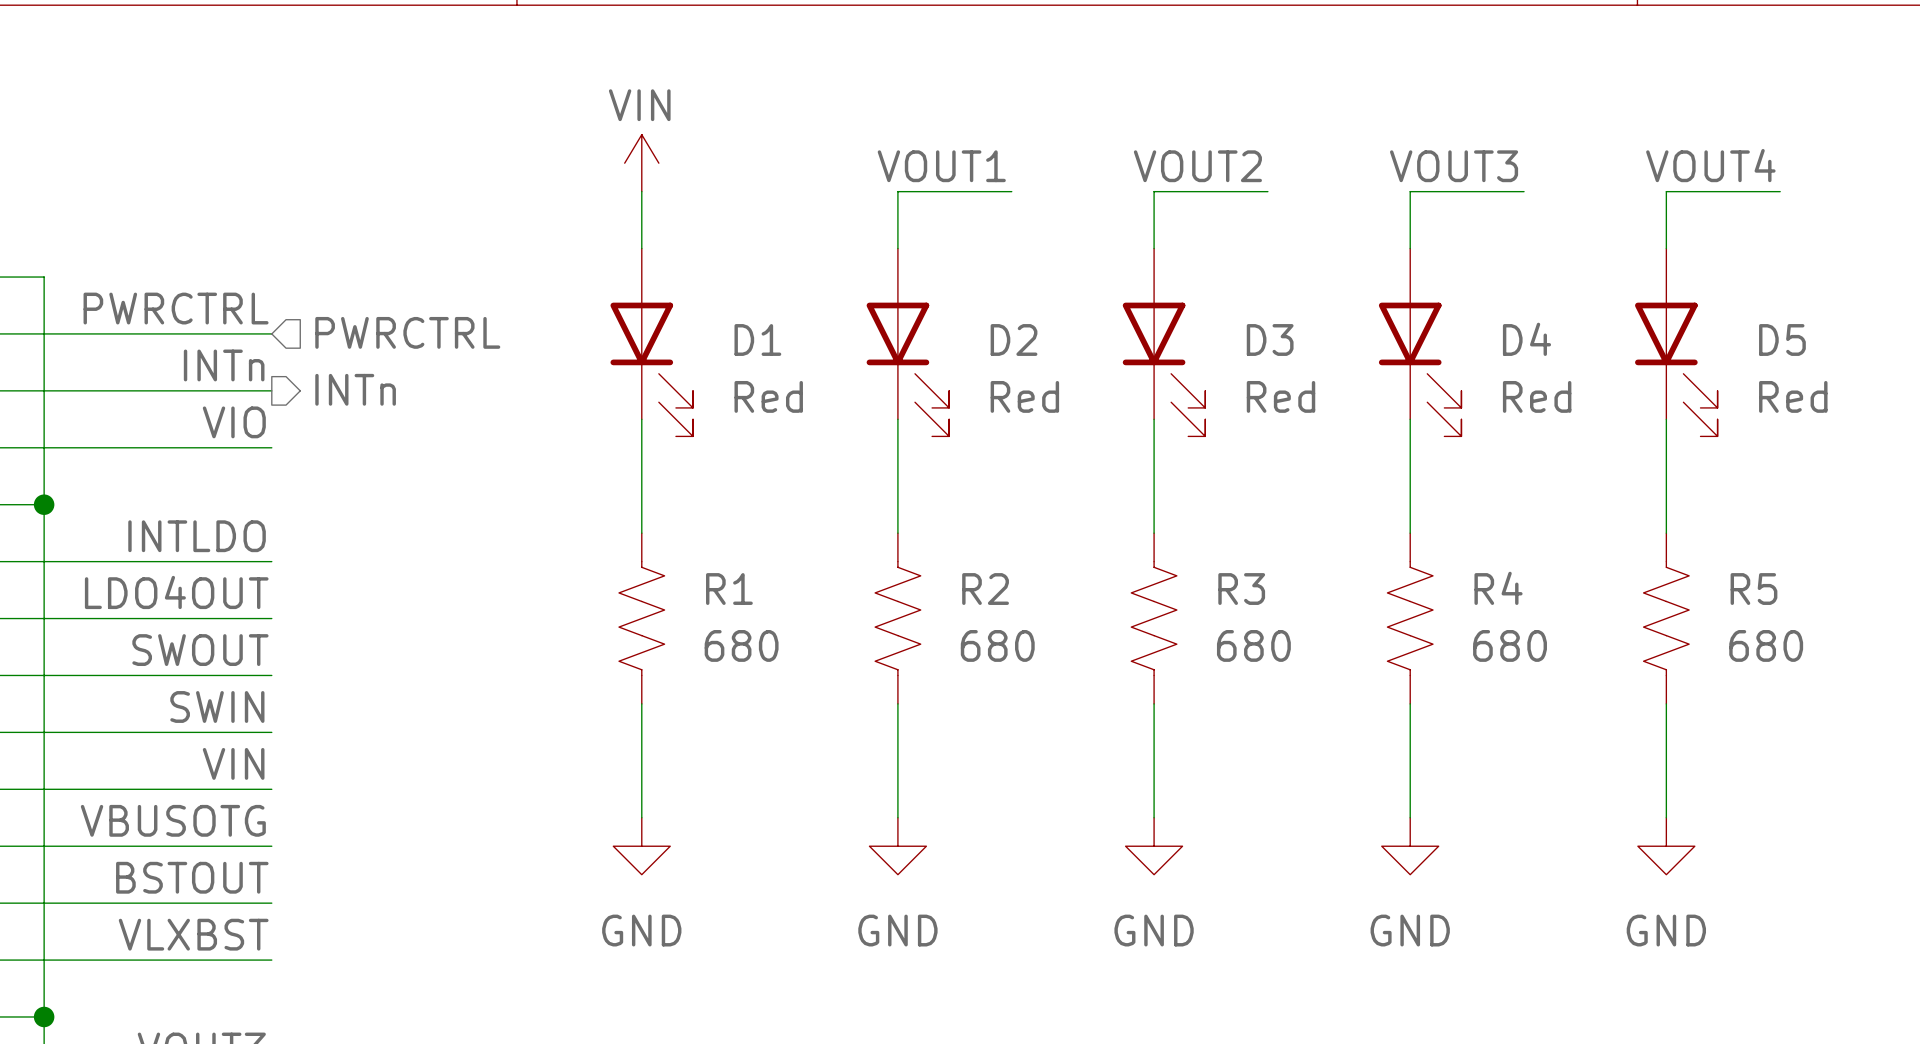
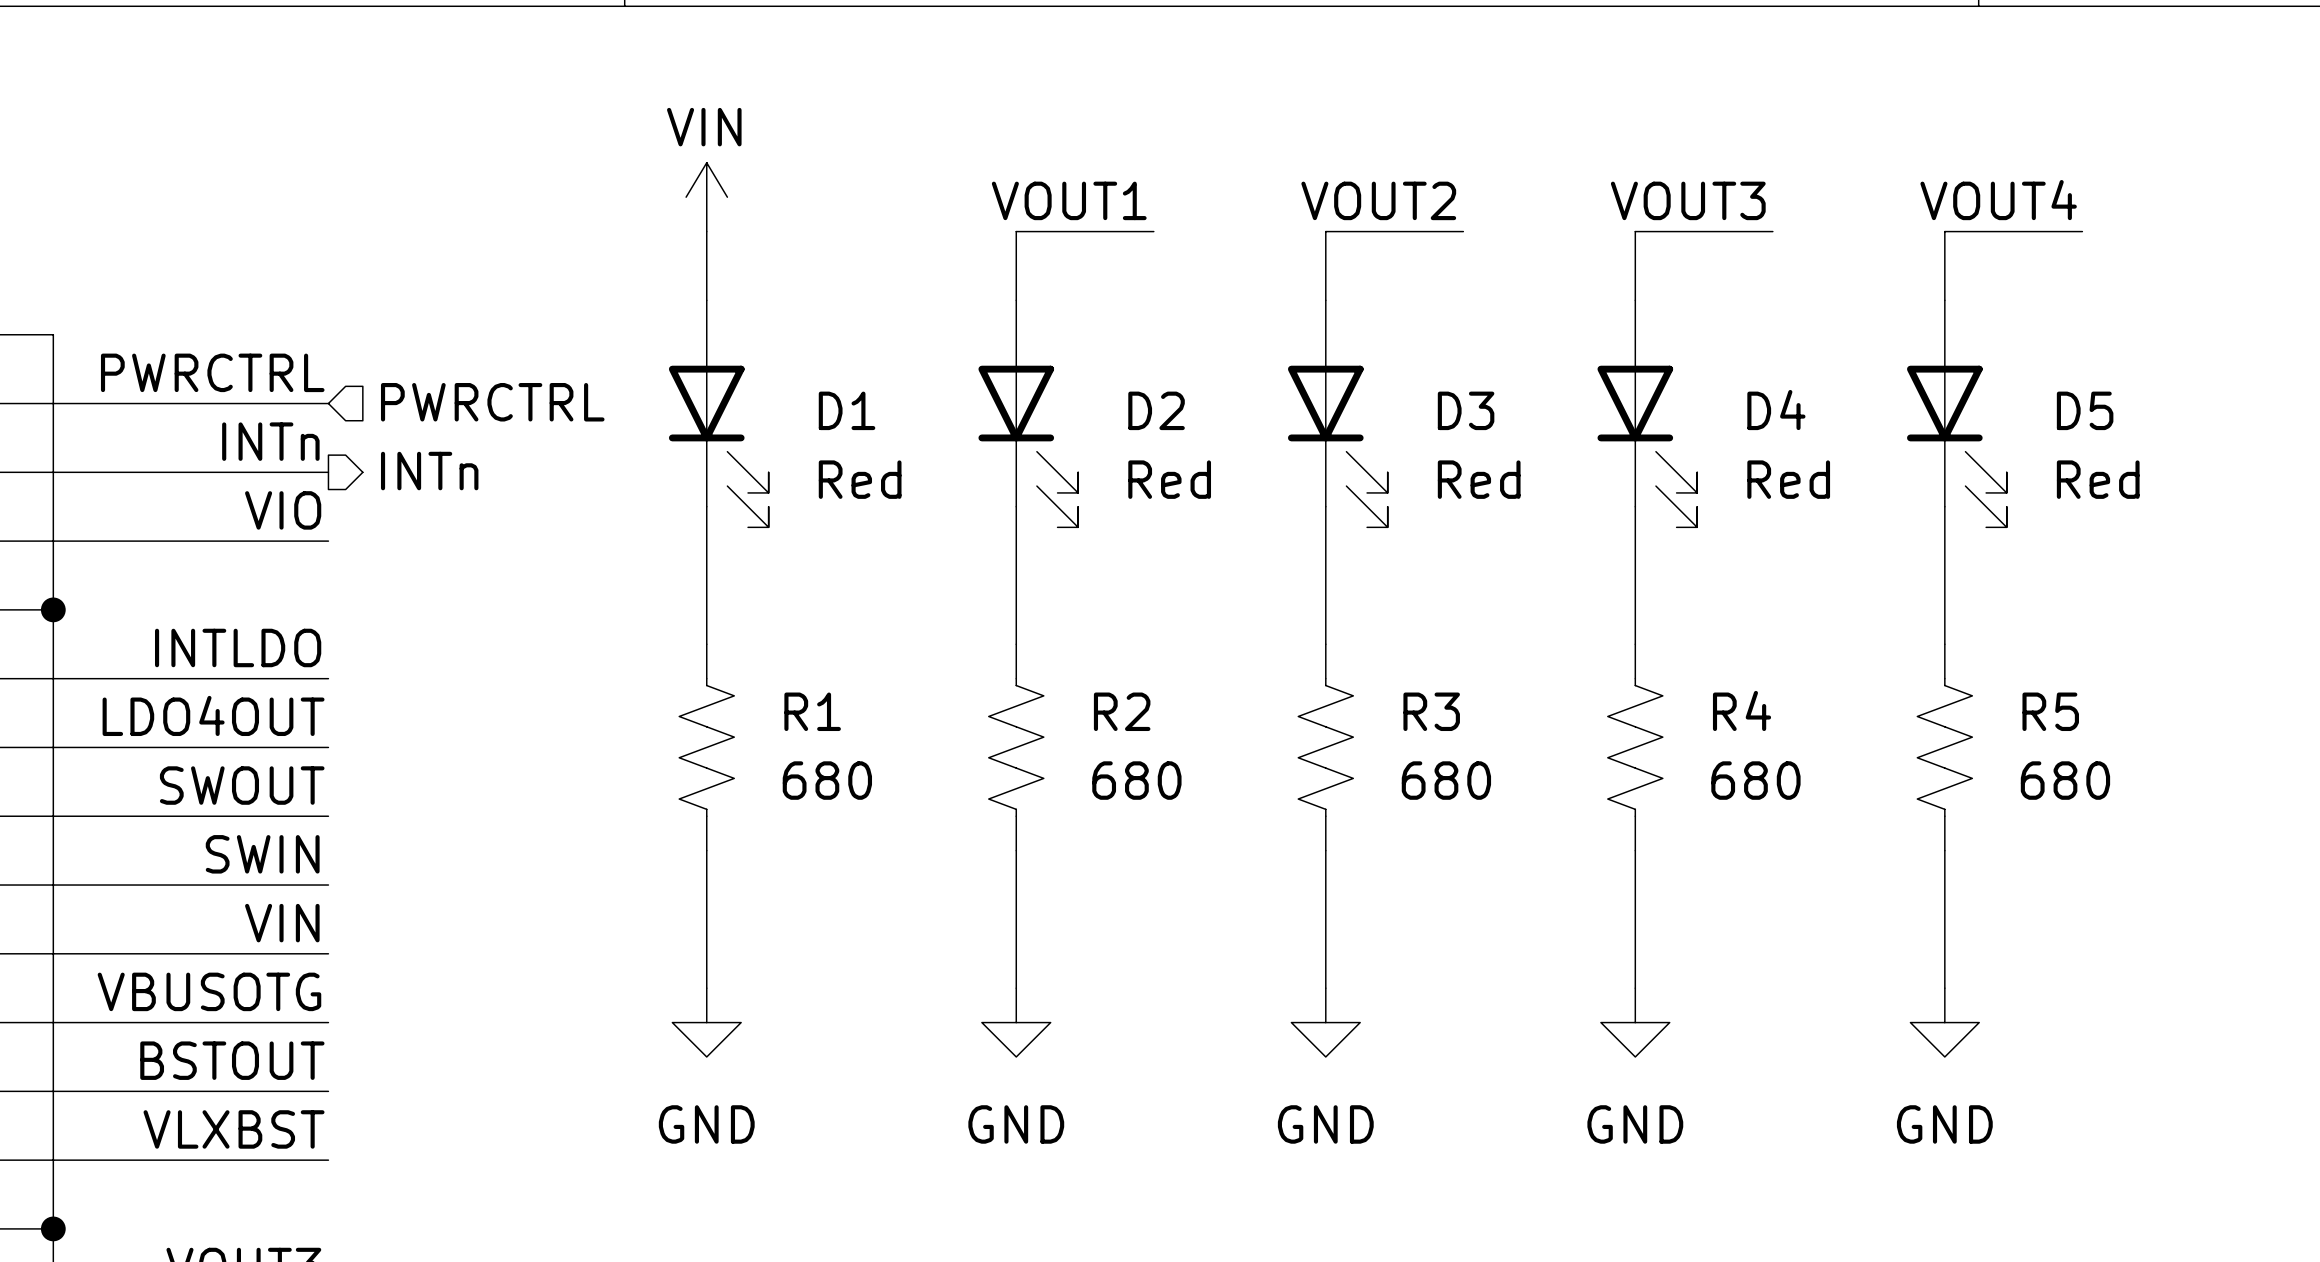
power symbol position: VIN (641, 163) -> VIN (706, 197)
label position: VOUT4 (1710, 165) -> VOUT4 (1998, 200)
label position: VOUT1 (941, 166) -> VOUT1 (1069, 200)
label position: VOUT2 (1197, 166) -> VOUT2 (1378, 200)
label position: VOUT3 (1454, 166) -> VOUT3 (1688, 200)
wire: (641, 191) (641, 248) -> (706, 231) (706, 300)
wire: (897, 191) (897, 248) -> (1085, 231) (1016, 231) (1016, 300)
wire: (954, 191) (1011, 191) -> none
wire: (1154, 191) (1154, 248) -> (1394, 231) (1325, 231) (1325, 300)
wire: (1210, 191) (1267, 191) -> none
wire: (1410, 191) (1410, 248) -> (1704, 231) (1635, 231) (1635, 300)
wire: (1467, 191) (1524, 191) -> none
wire: (1666, 191) (1666, 248) -> (2013, 231) (1944, 231) (1944, 300)
wire: (1723, 191) (1780, 191) -> none
D1 position: (651, 342) -> (718, 413)
D2 position: (907, 342) -> (1028, 413)
D3 position: (1164, 342) -> (1337, 413)
D4 position: (1420, 342) -> (1647, 413)
D5 position: (1676, 342) -> (1956, 413)
wire: (641, 419) (641, 533) -> (706, 506) (706, 644)
wire: (897, 419) (897, 533) -> (1016, 506) (1016, 644)
wire: (1154, 419) (1154, 533) -> (1325, 506) (1325, 644)
wire: (1410, 419) (1410, 533) -> (1635, 506) (1635, 644)
wire: (1666, 419) (1666, 533) -> (1944, 506) (1944, 644)
R1 position: (641, 618) -> (706, 747)
R2 position: (897, 618) -> (1016, 747)
R3 position: (1154, 618) -> (1325, 747)
R4 position: (1410, 618) -> (1635, 747)
R5 position: (1666, 618) -> (1944, 747)
wire: (641, 703) (641, 817) -> (706, 850) (706, 988)
wire: (897, 703) (897, 817) -> (1016, 850) (1016, 988)
wire: (1154, 703) (1154, 817) -> (1325, 850) (1325, 988)
wire: (1410, 703) (1410, 817) -> (1635, 850) (1635, 988)
wire: (1666, 703) (1666, 817) -> (1944, 850) (1944, 988)
power symbol position: GND (641, 846) -> GND (706, 1022)
power symbol position: GND (897, 846) -> GND (1016, 1022)
power symbol position: GND (1154, 846) -> GND (1325, 1022)
power symbol position: GND (1410, 846) -> GND (1635, 1022)
power symbol position: GND (1666, 846) -> GND (1944, 1022)

